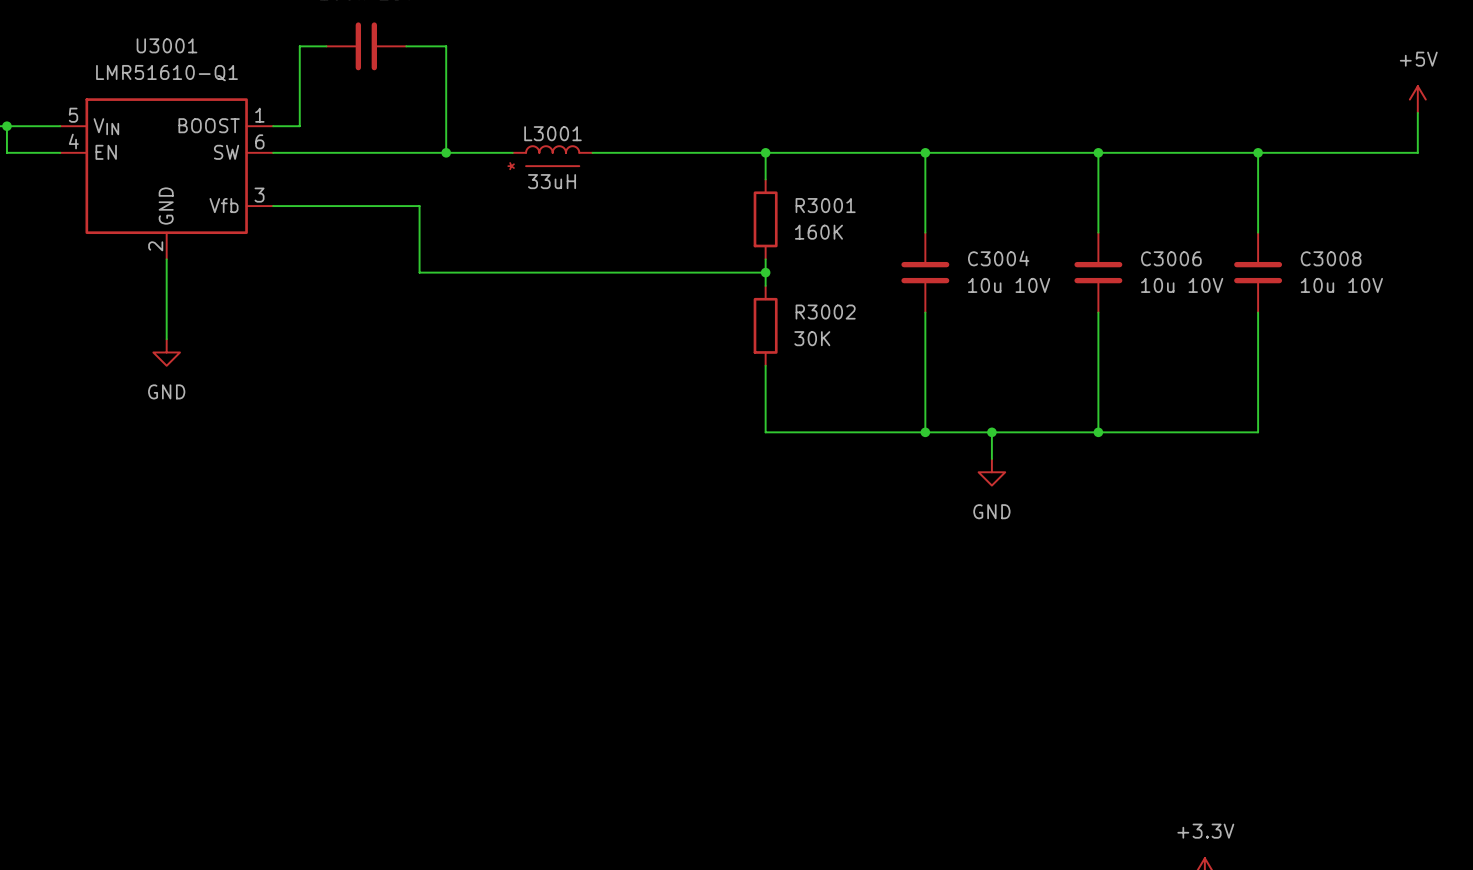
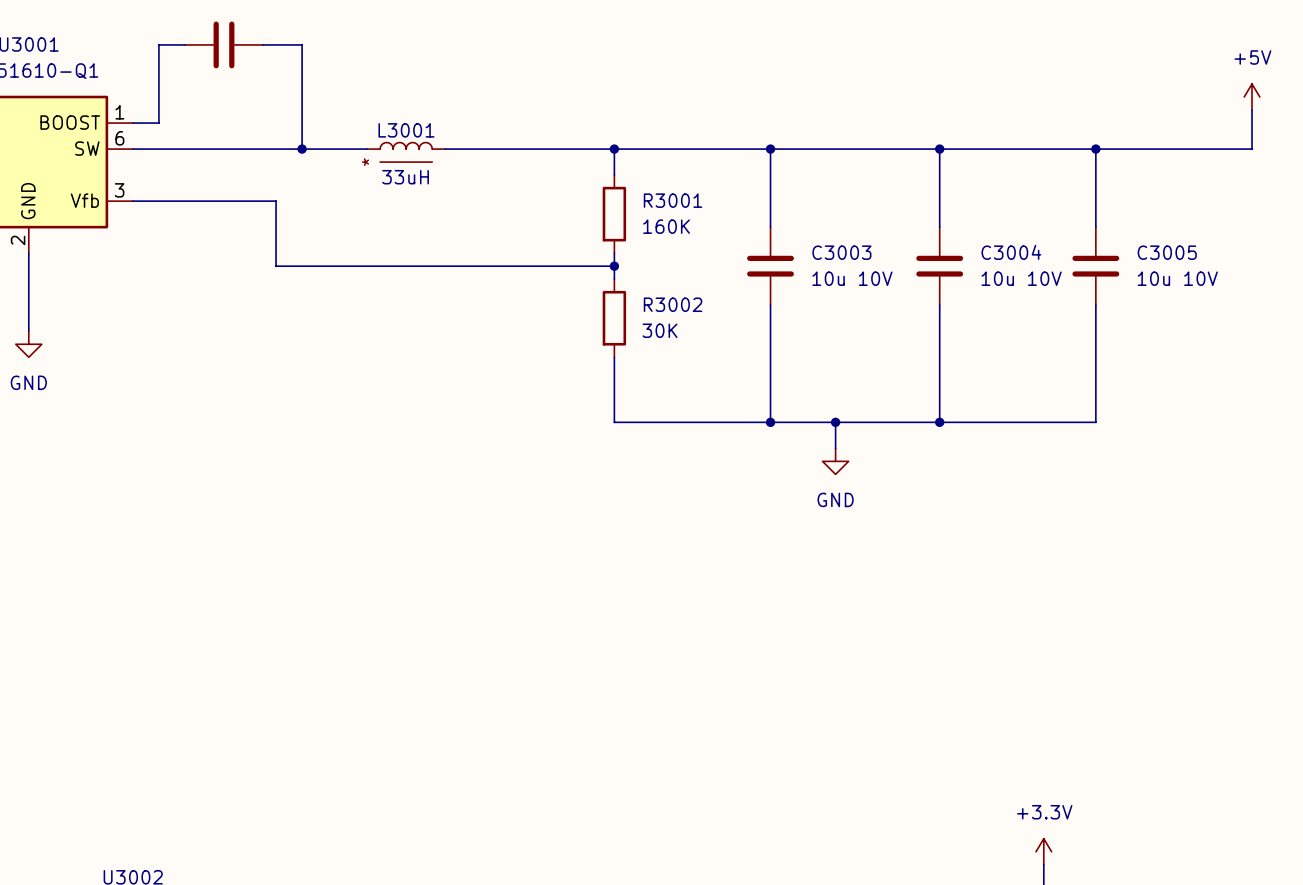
C3004 name: C3004 (998, 258) -> C3003 (841, 252)
C3006 name: C3006 (1171, 258) -> C3004 (1011, 252)
C3008 name: C3008 (1331, 258) -> C3005 (1167, 252)

